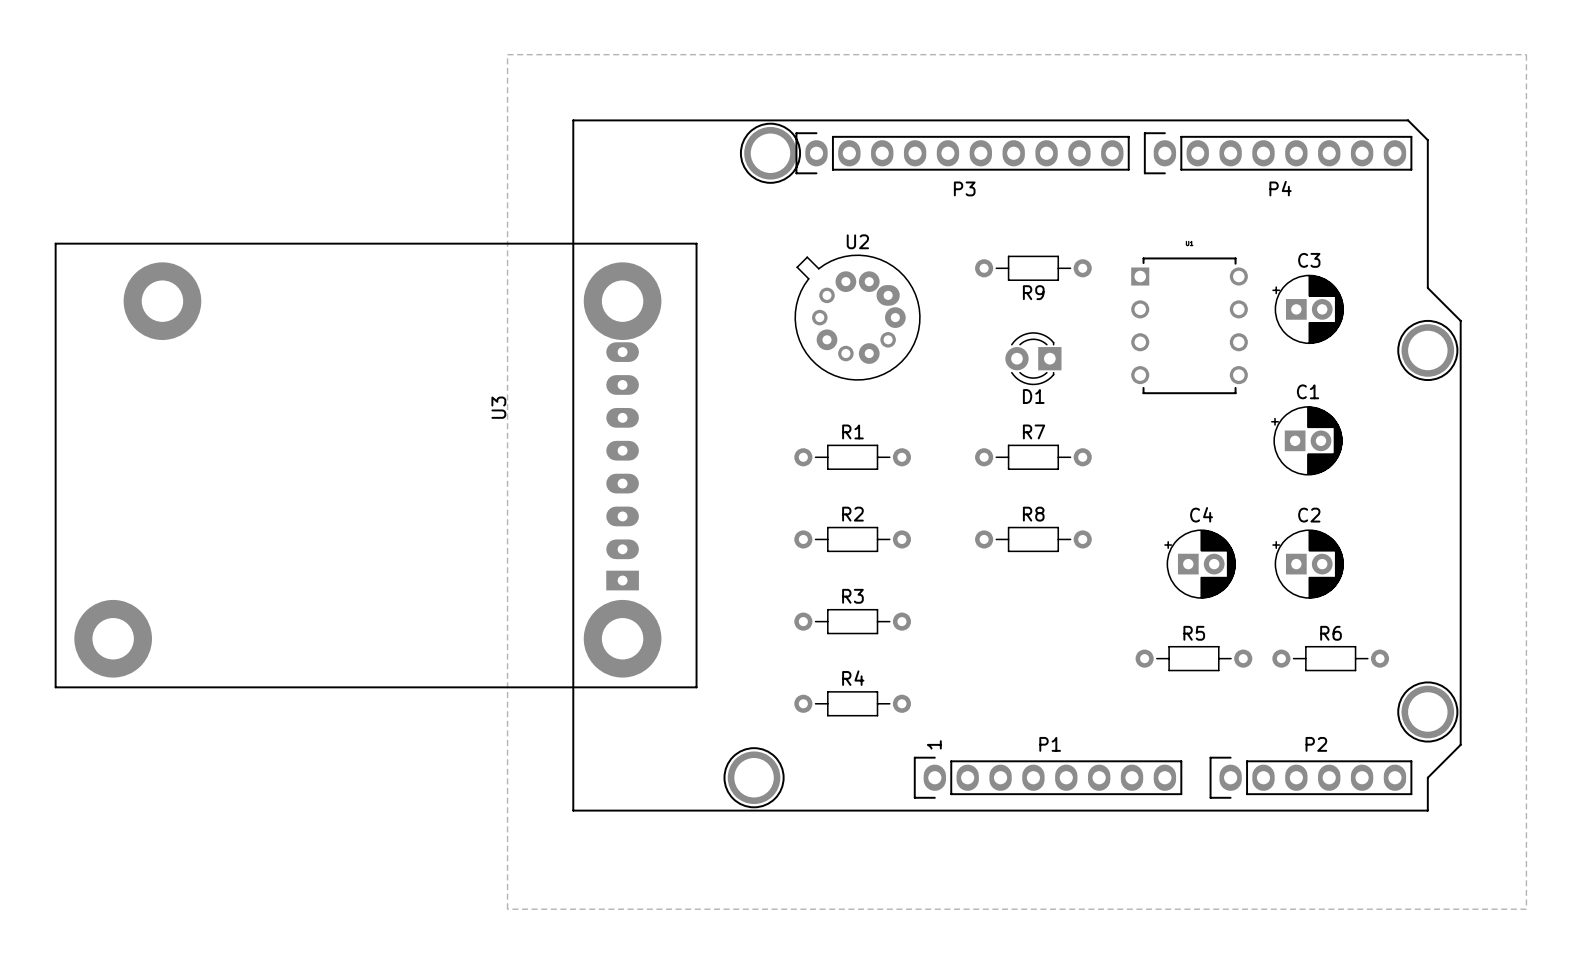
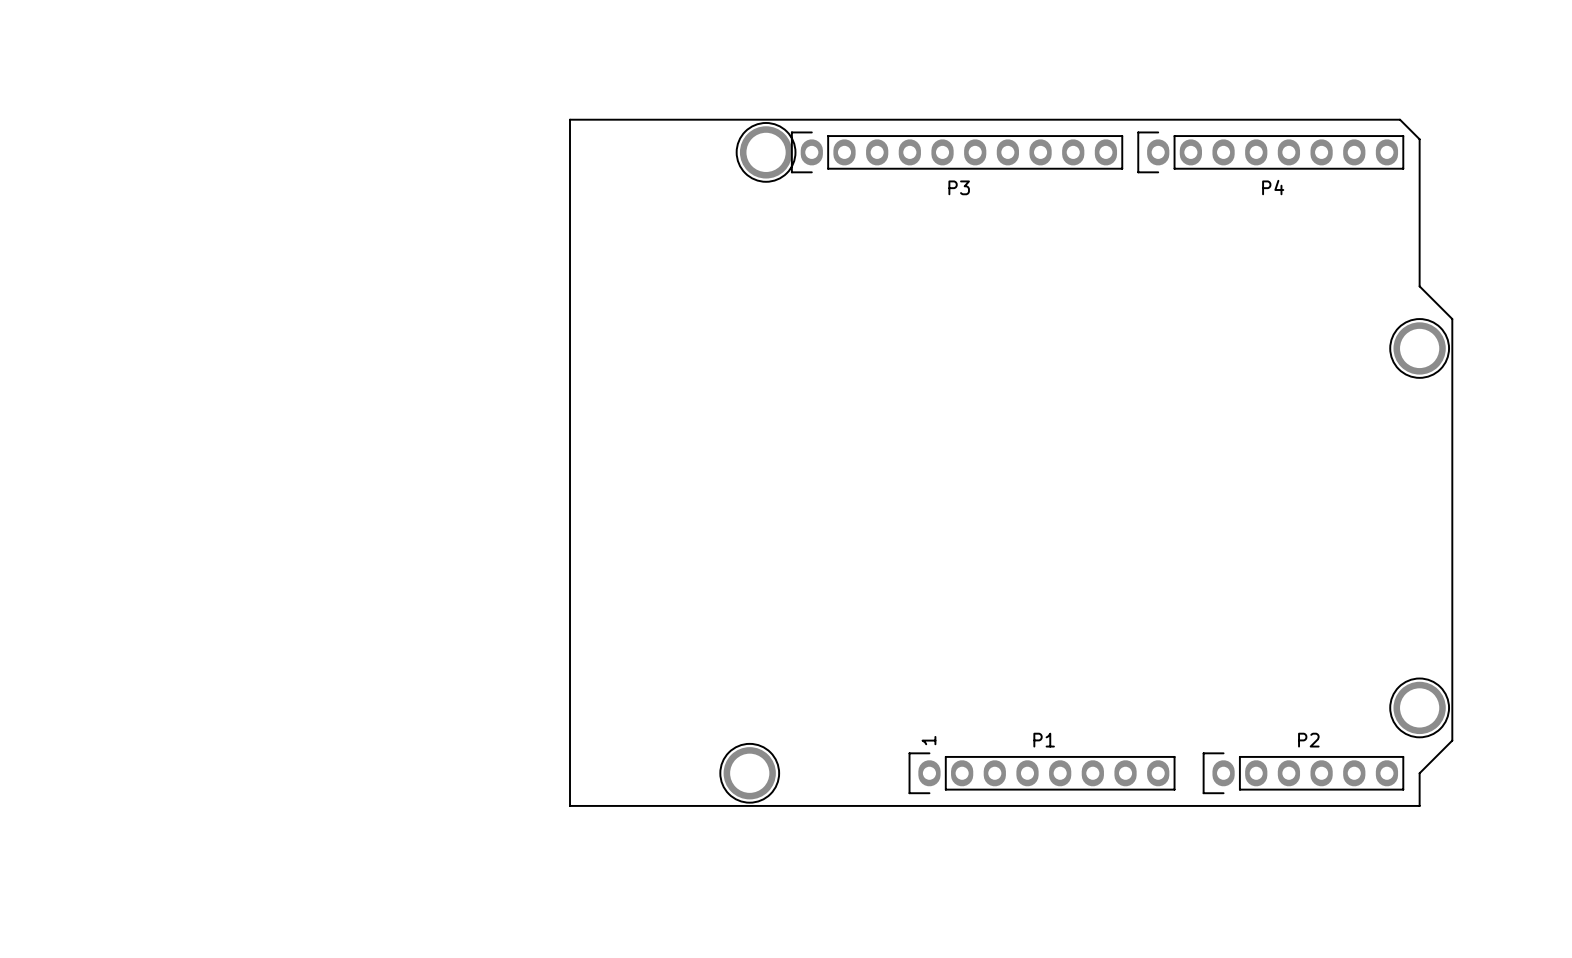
zone outline: (507, 54) (507, 909) (1526, 909) (1526, 54) (507, 54) -> none
R9: (1033, 268) -> none
C3: (1308, 309) -> none
U2: (857, 317) -> none
part: (1189, 325) -> none
D1: (1033, 358) -> none
C1: (1306, 440) -> none
R1: (852, 457) -> none
R7: (1033, 457) -> none
U3: (376, 465) -> none
R2: (852, 539) -> none
R8: (1033, 539) -> none
C4: (1200, 564) -> none
C2: (1308, 564) -> none
R3: (852, 621) -> none
R5: (1193, 658) -> none
R6: (1330, 658) -> none
R4: (852, 703) -> none

